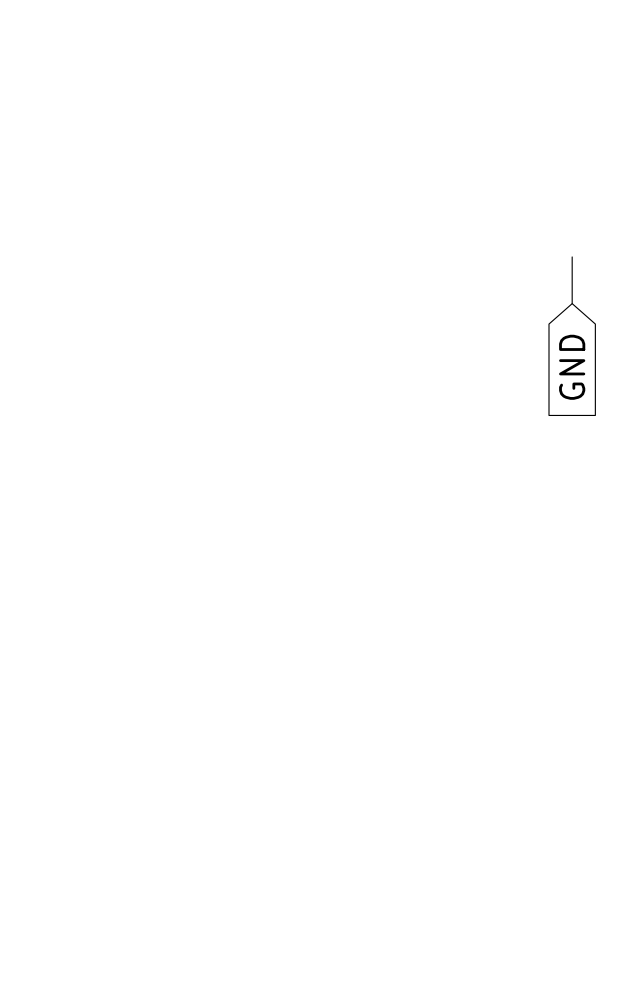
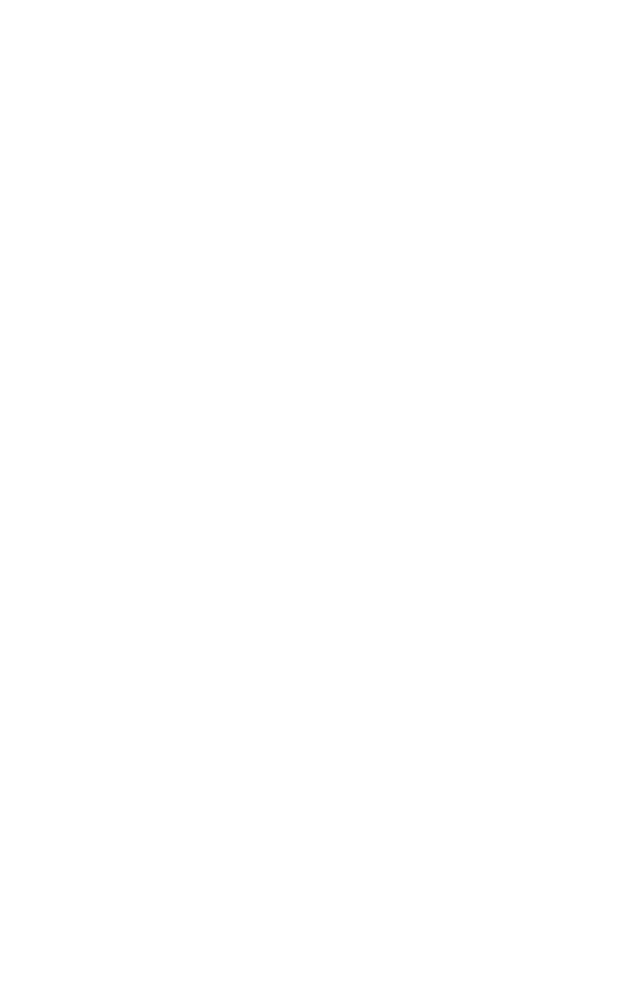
wire: (572, 256) (572, 303) -> none
global label: GND (572, 367) -> none

